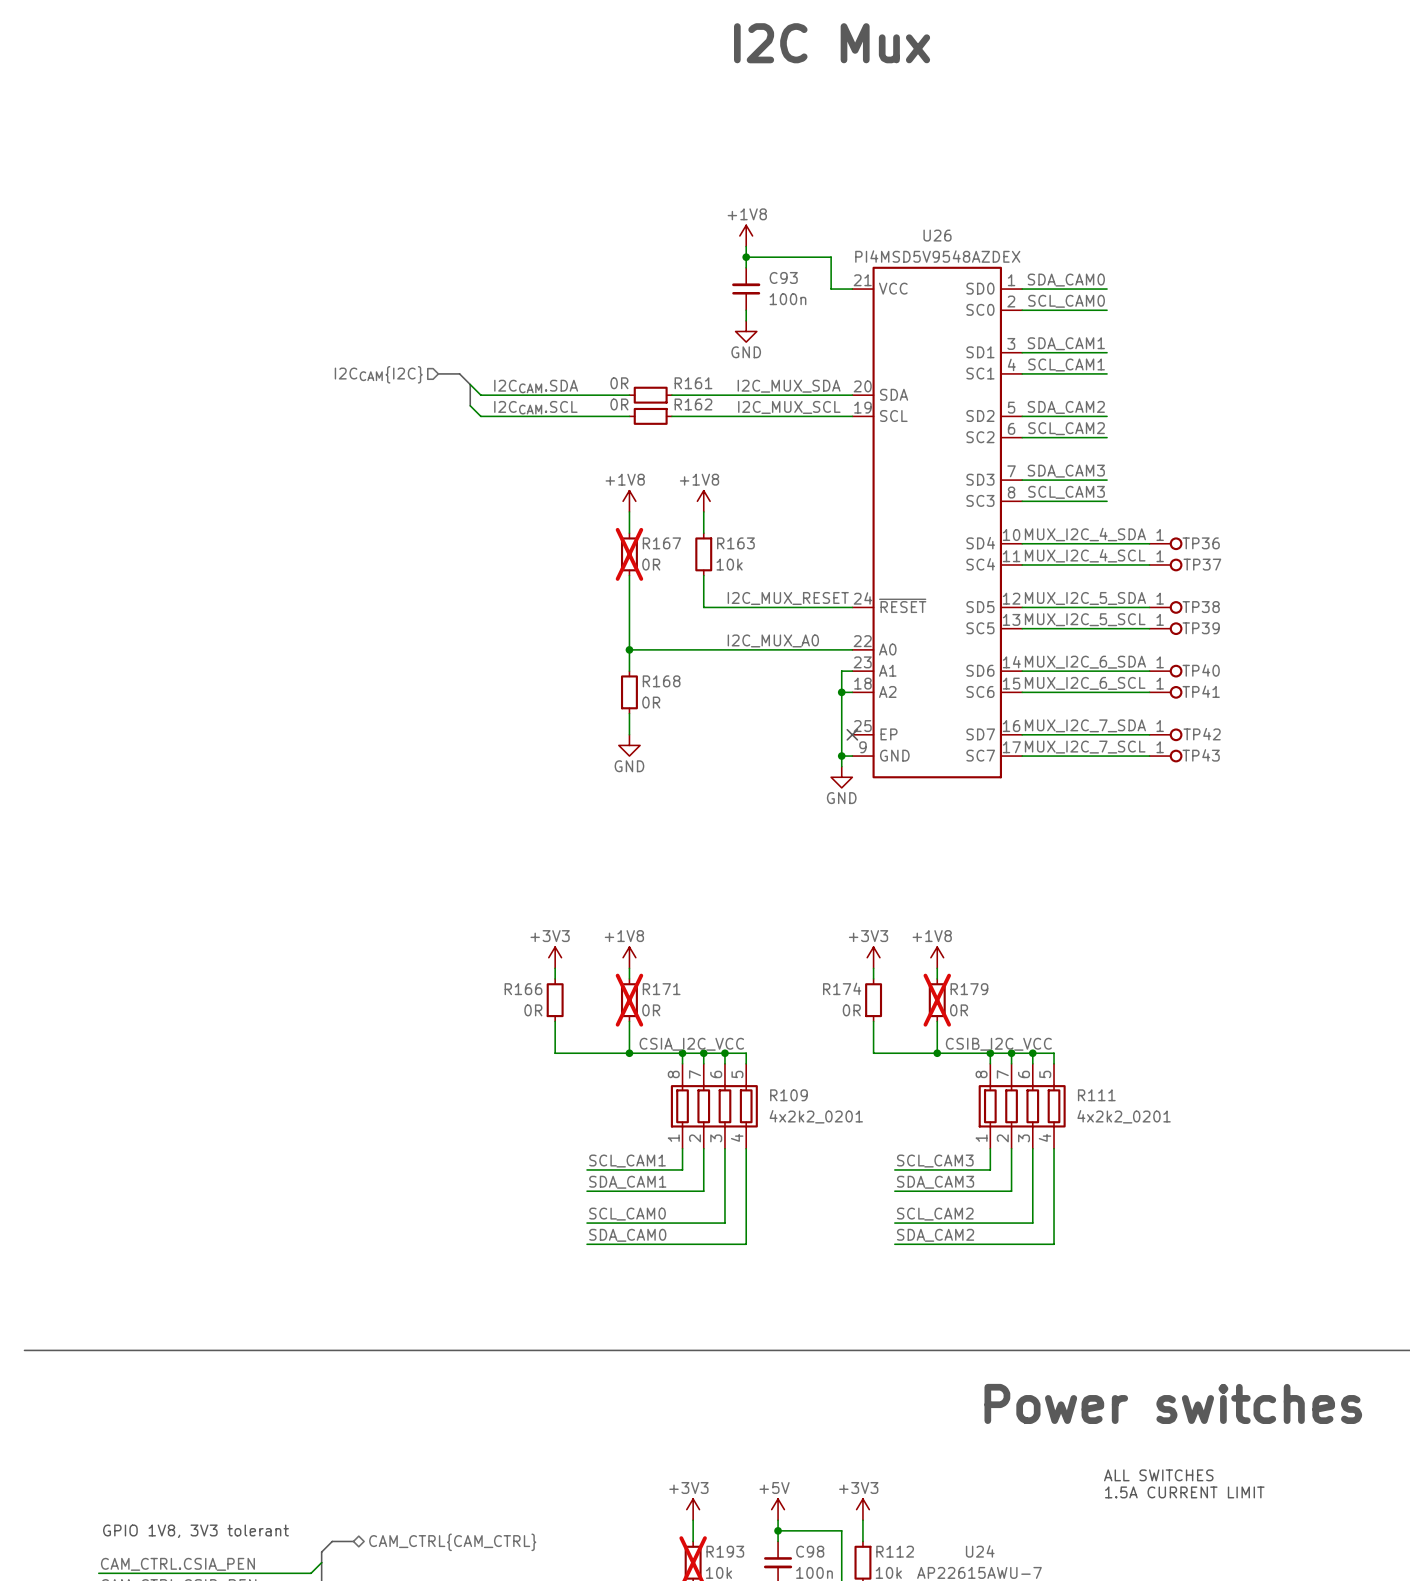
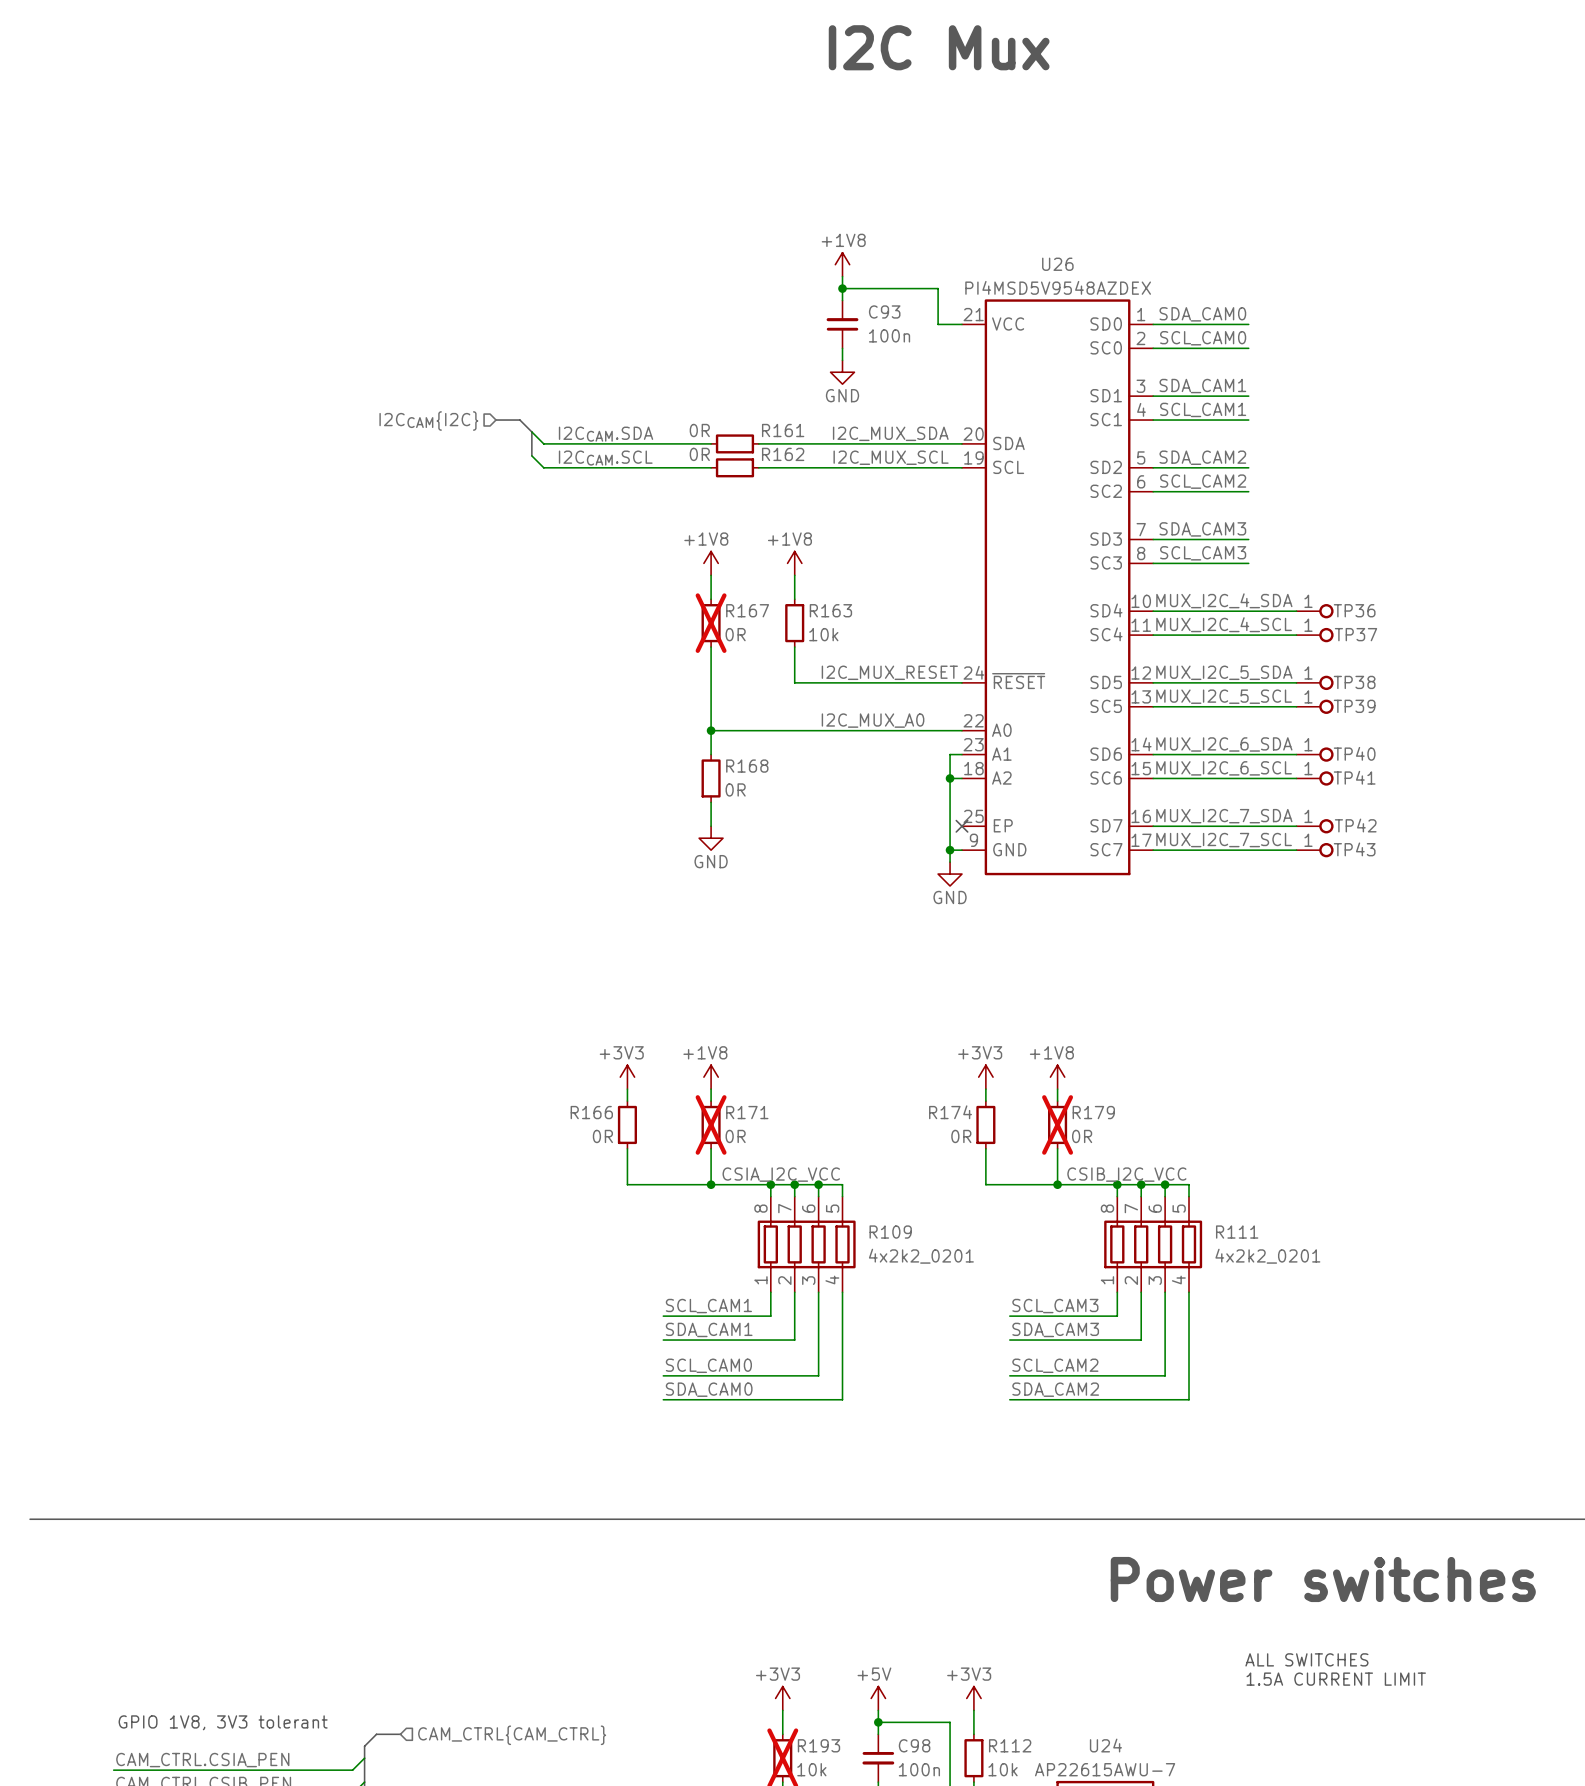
hierarchical label shape: bidirectional (452, 1542) -> input (512, 1735)

